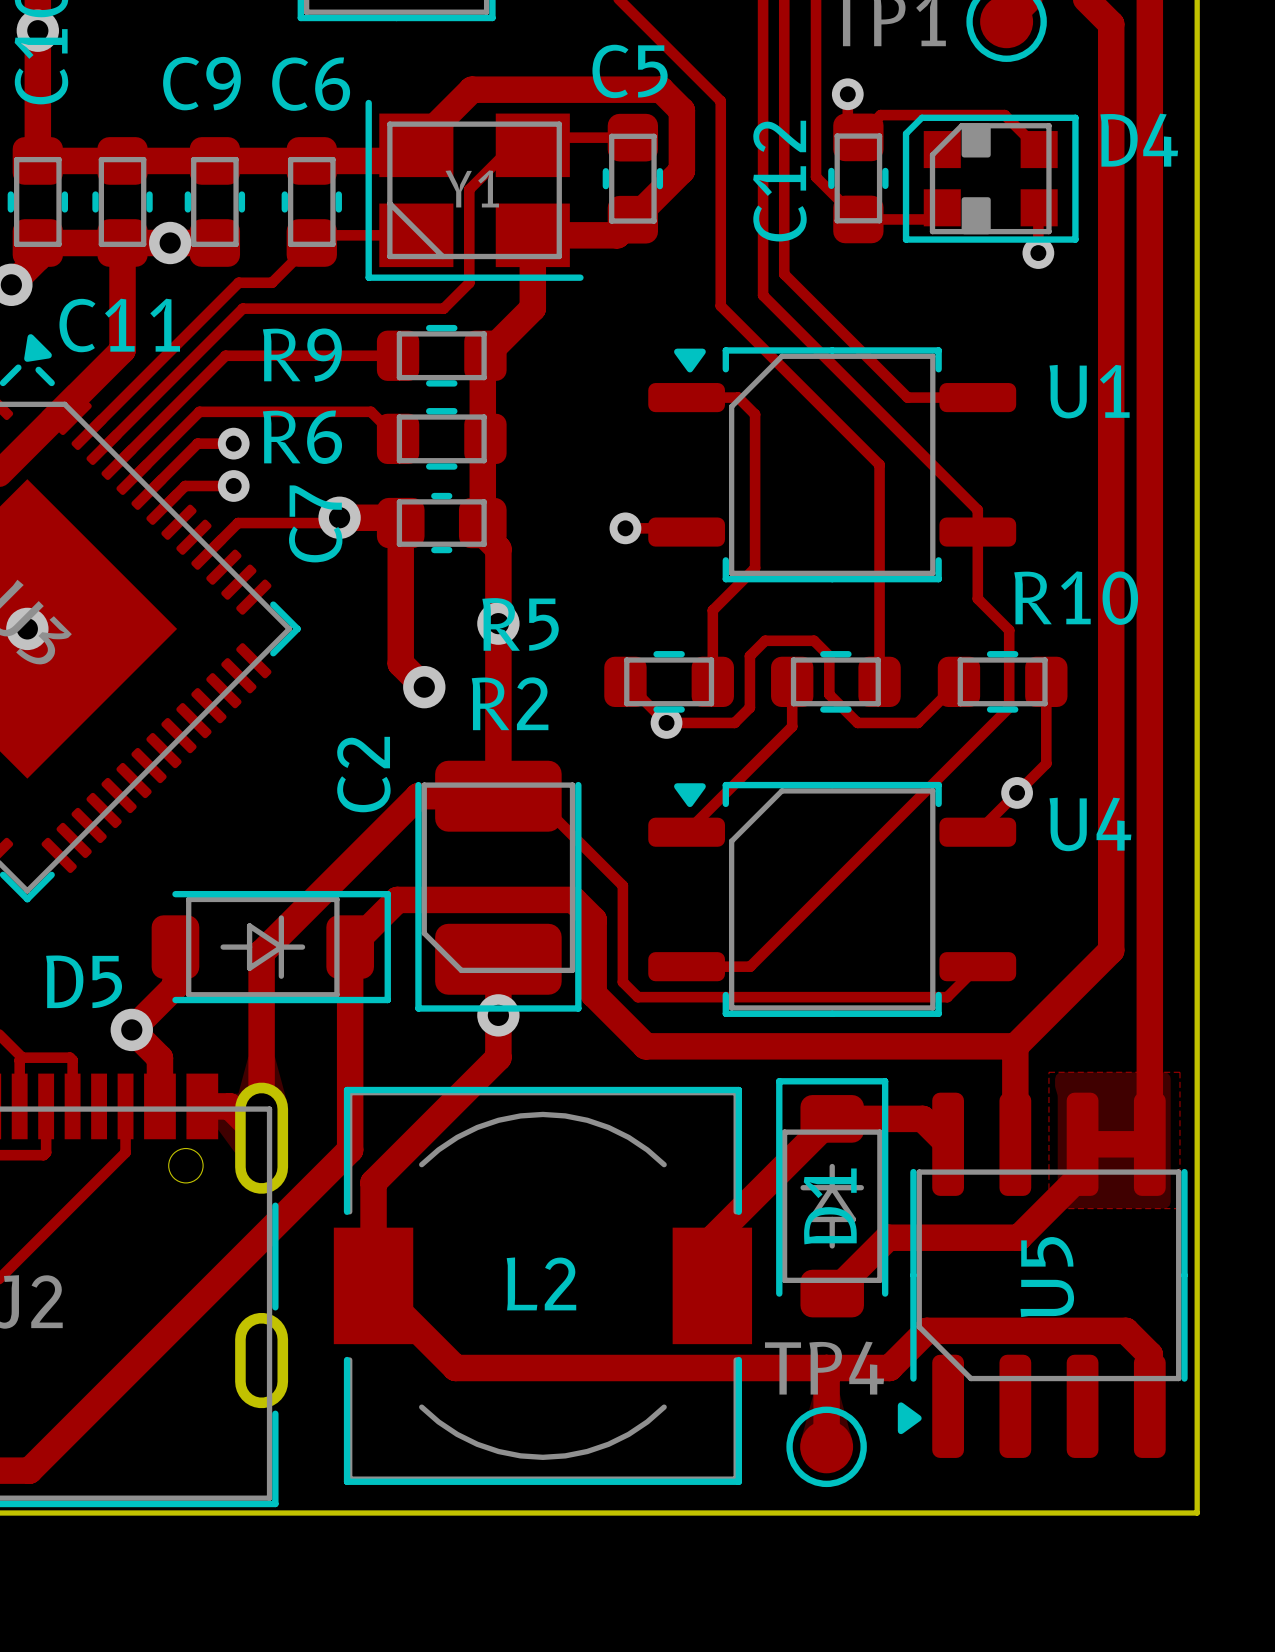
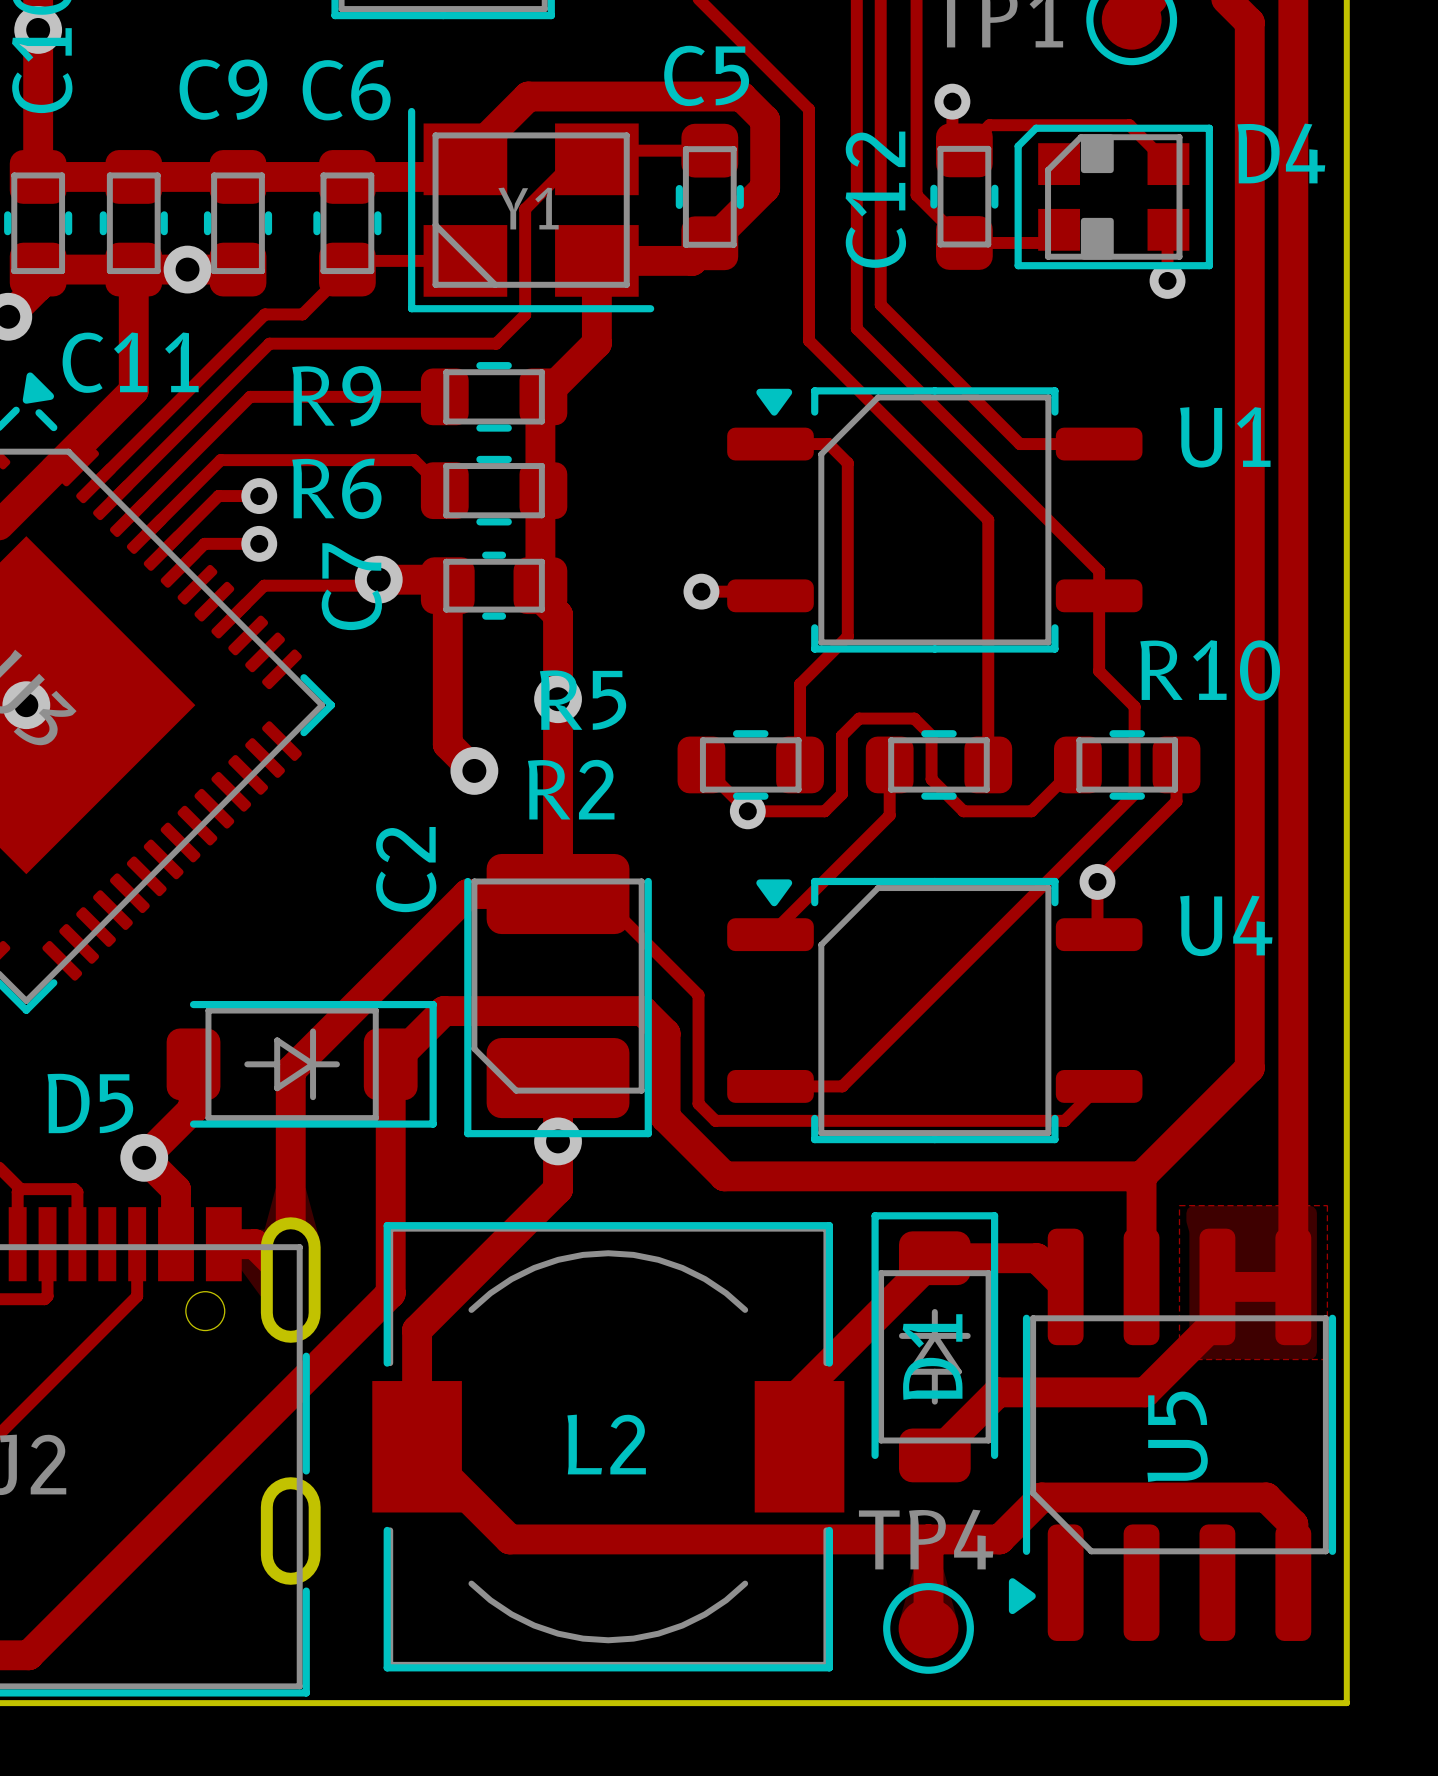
track: (1046, 714) (1046, 763) (977, 832) -> (1176, 801) (1097, 880) (1097, 932) (1099, 934)
via position: (1017, 792) -> (1097, 881)

